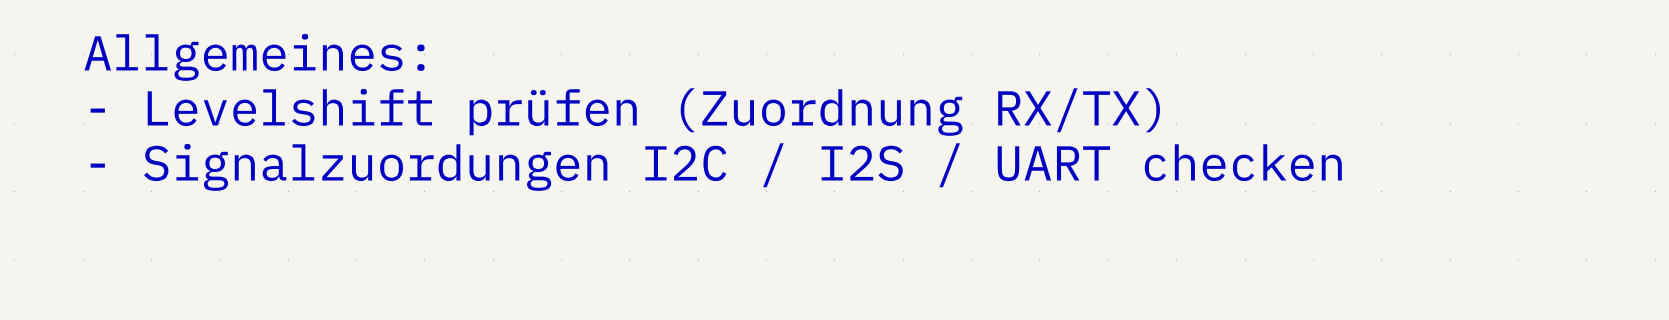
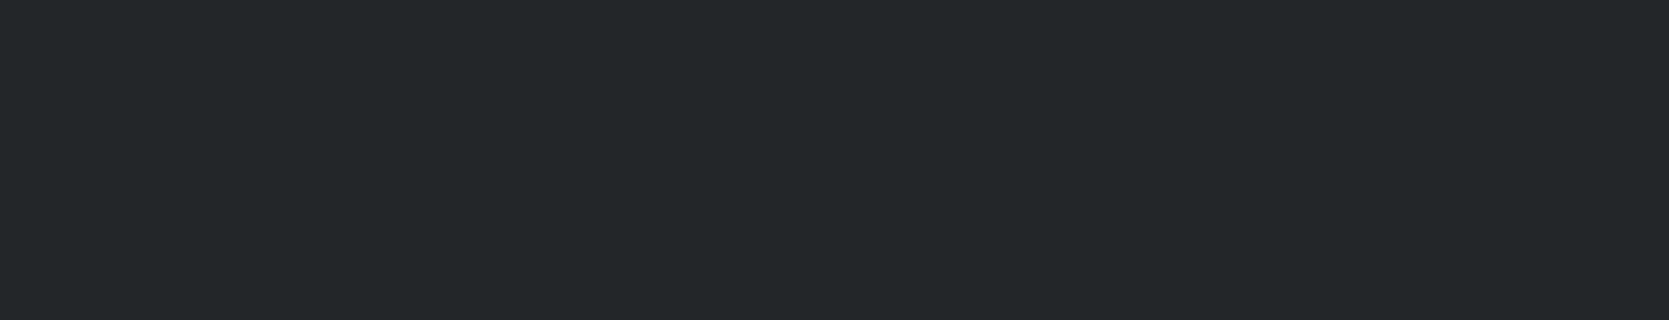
text: Allgemeines: (254, 57) -> none
text: - Levelshift prüfen (Zuordnung RX/TX) (625, 112) -> none
text: - Signalzuordungen I2C / I2S / UART checken (716, 167) -> none

